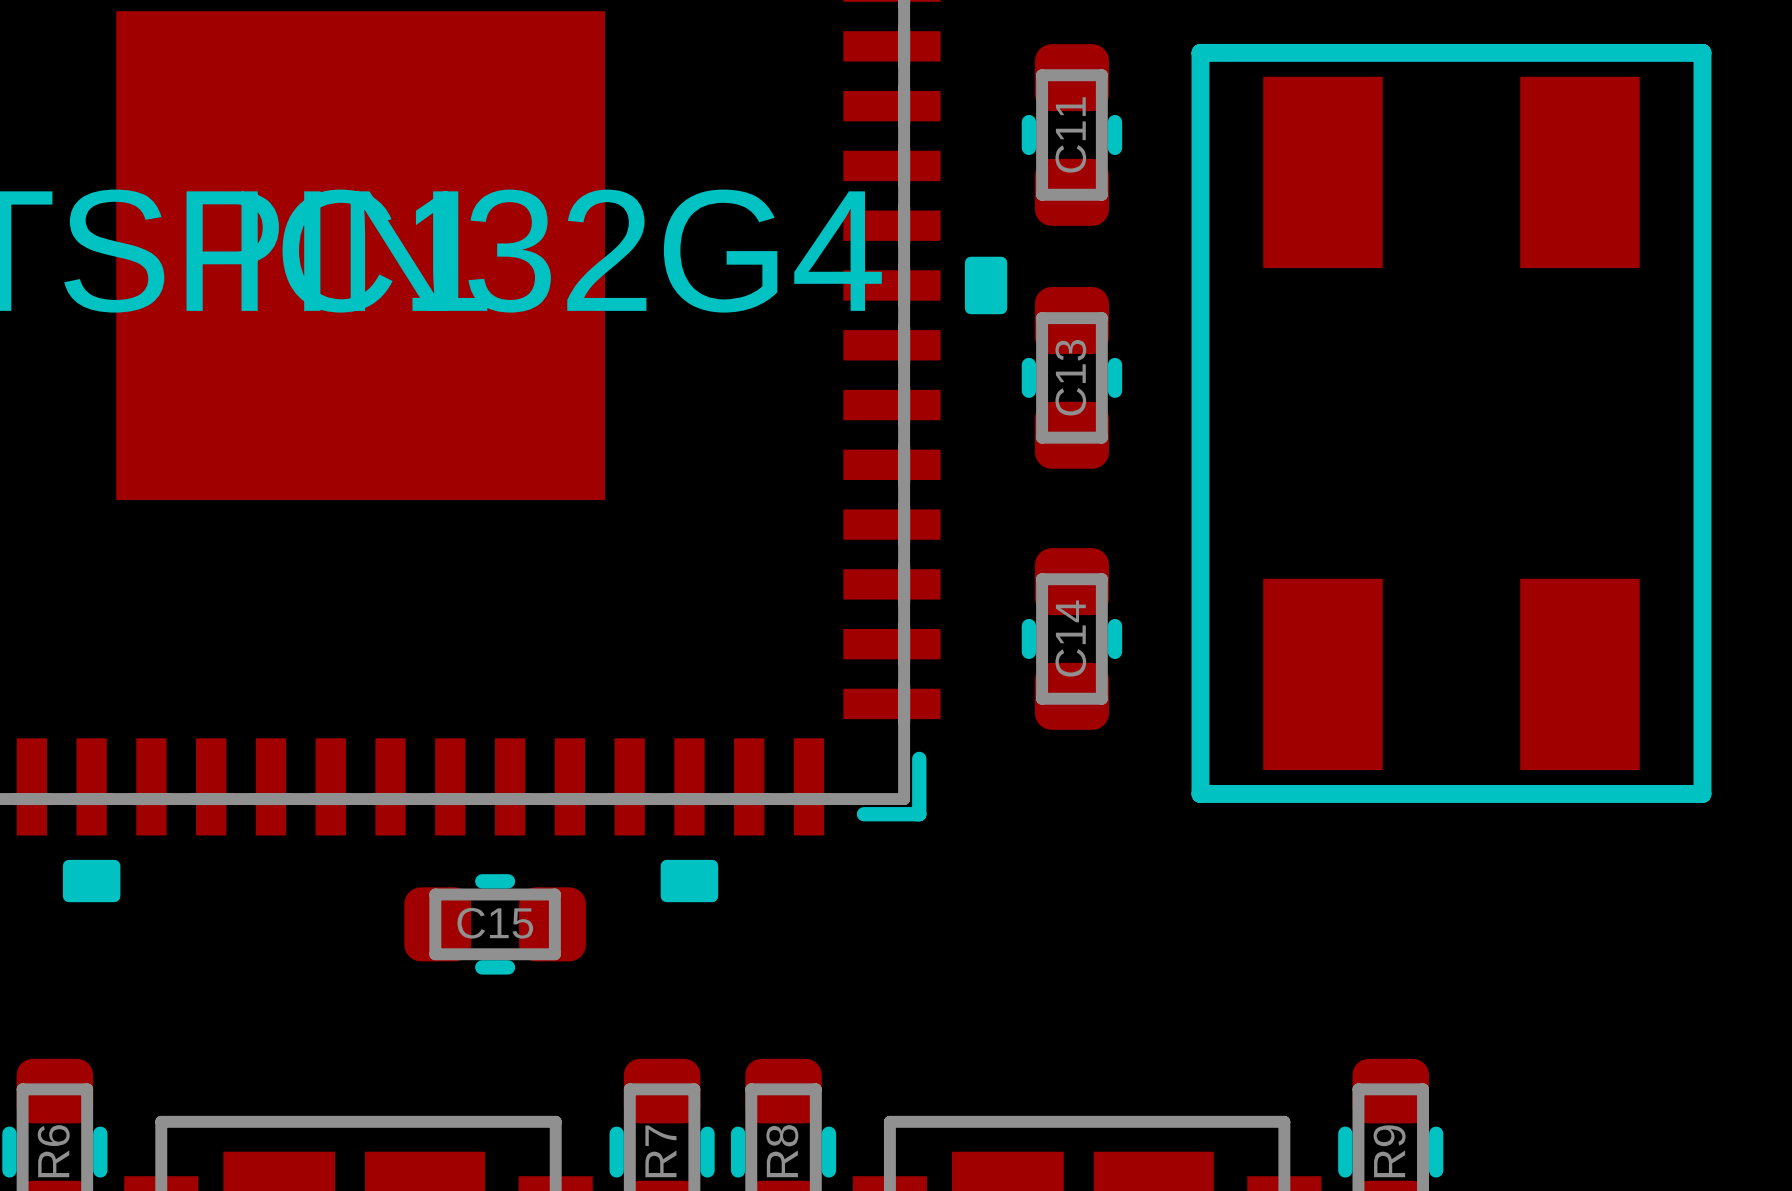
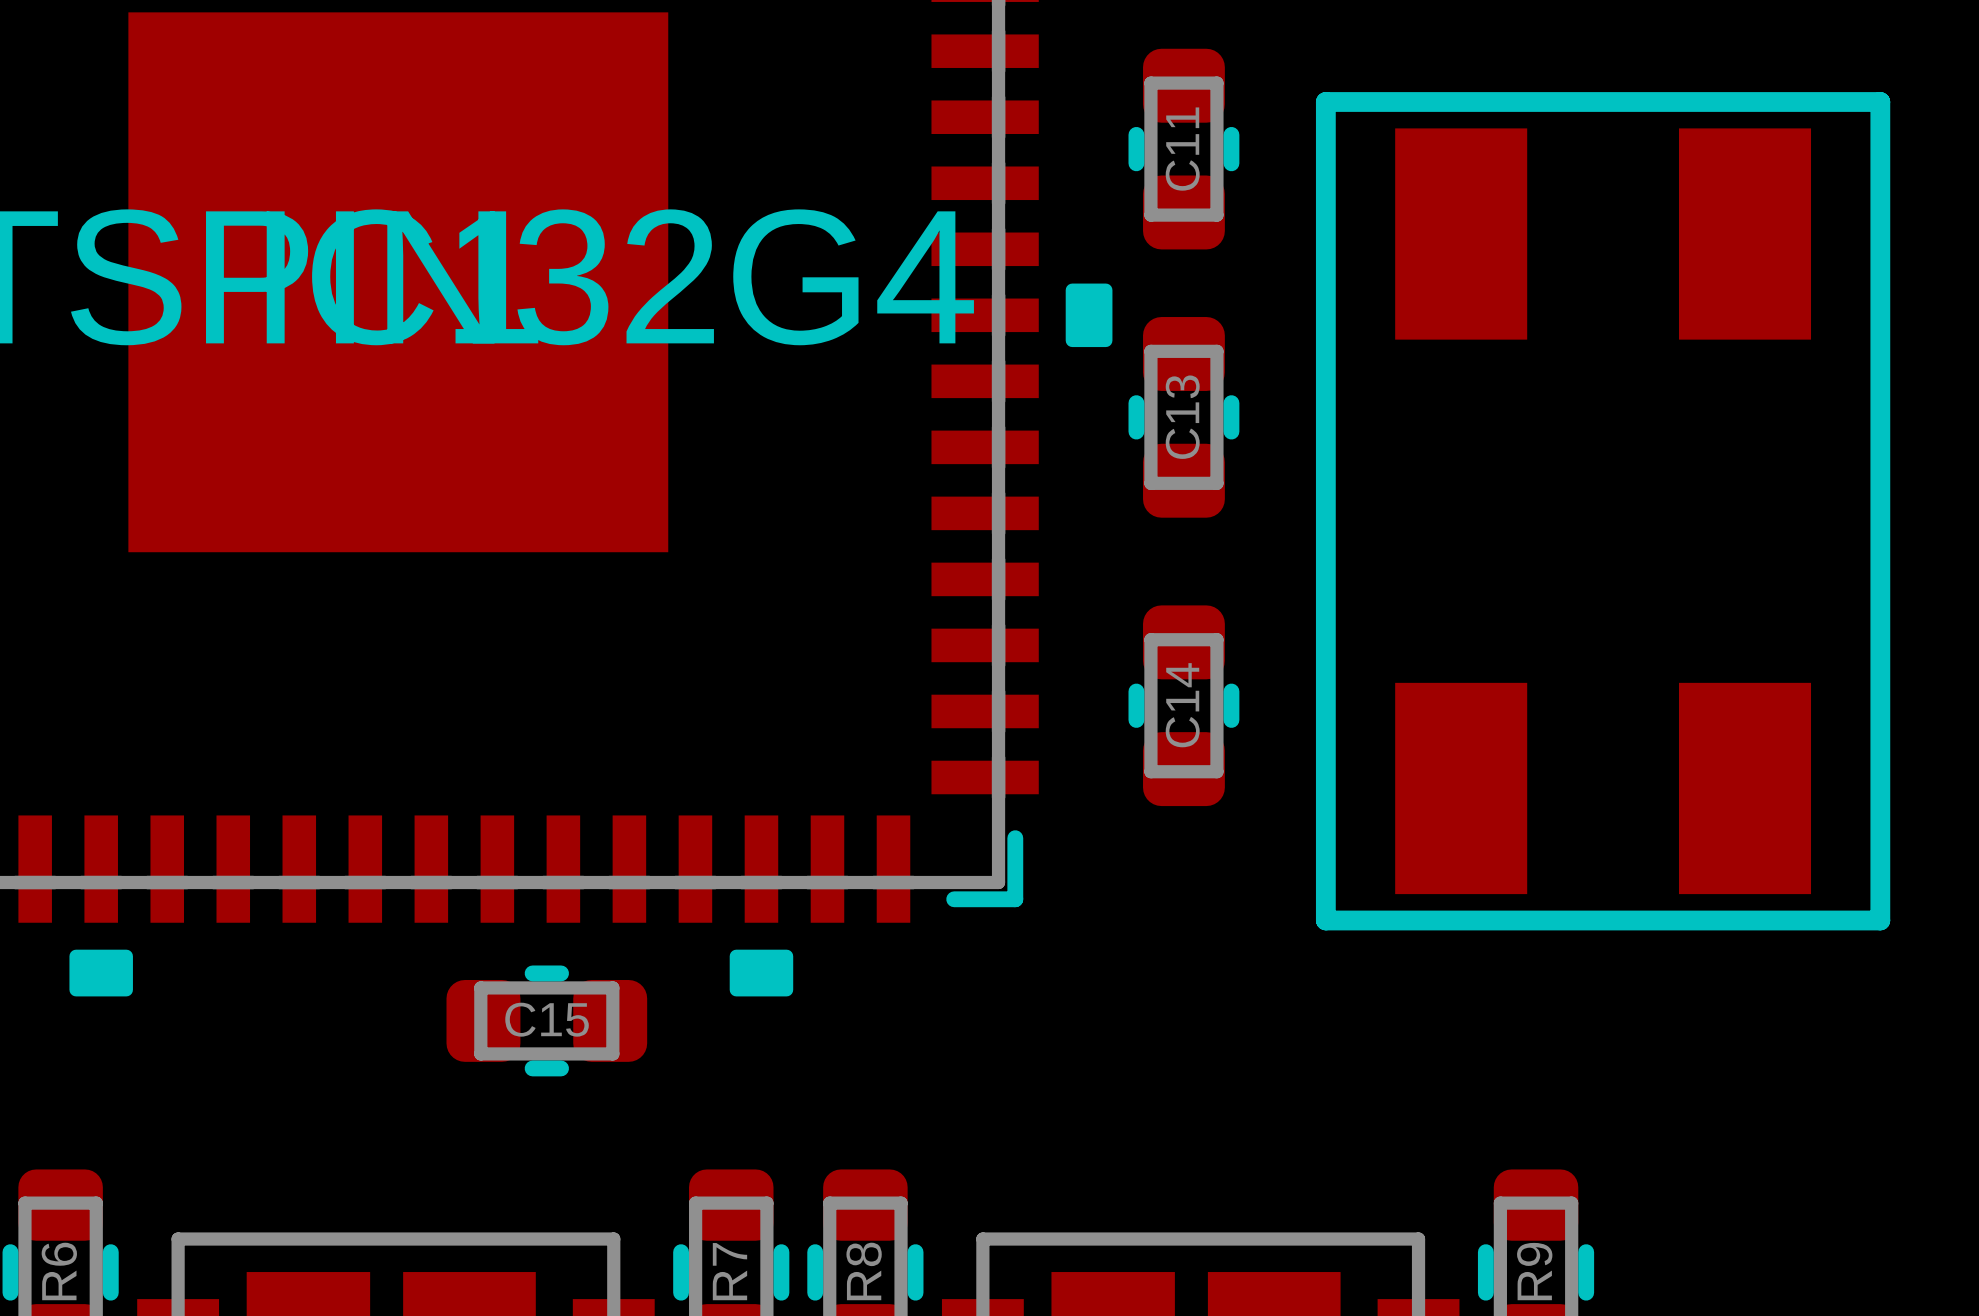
part position: (1451, 423) -> (1603, 511)

